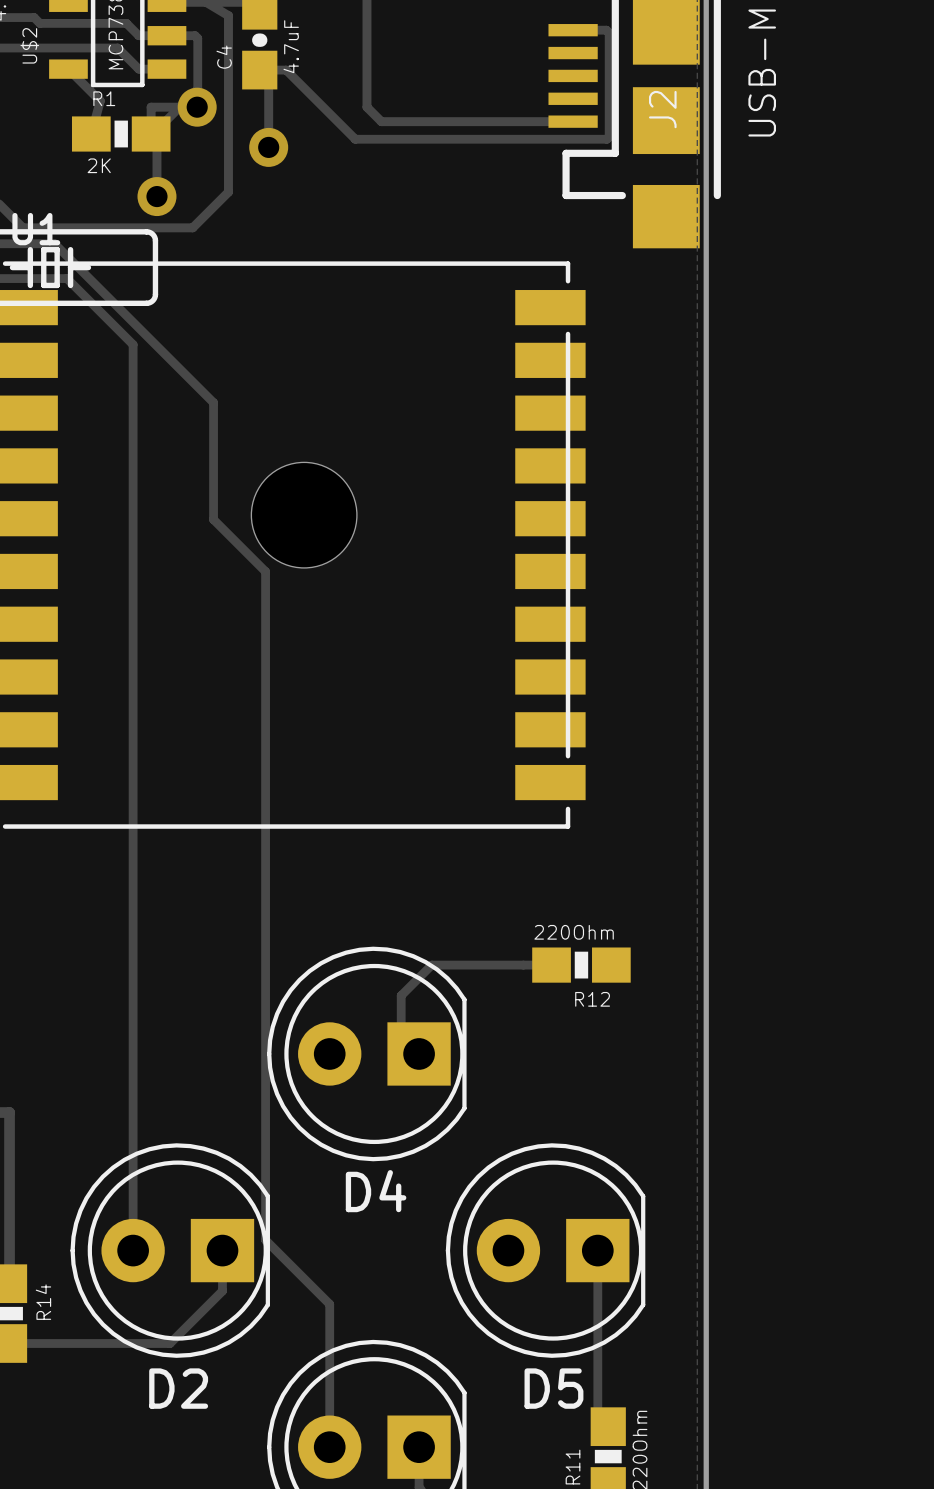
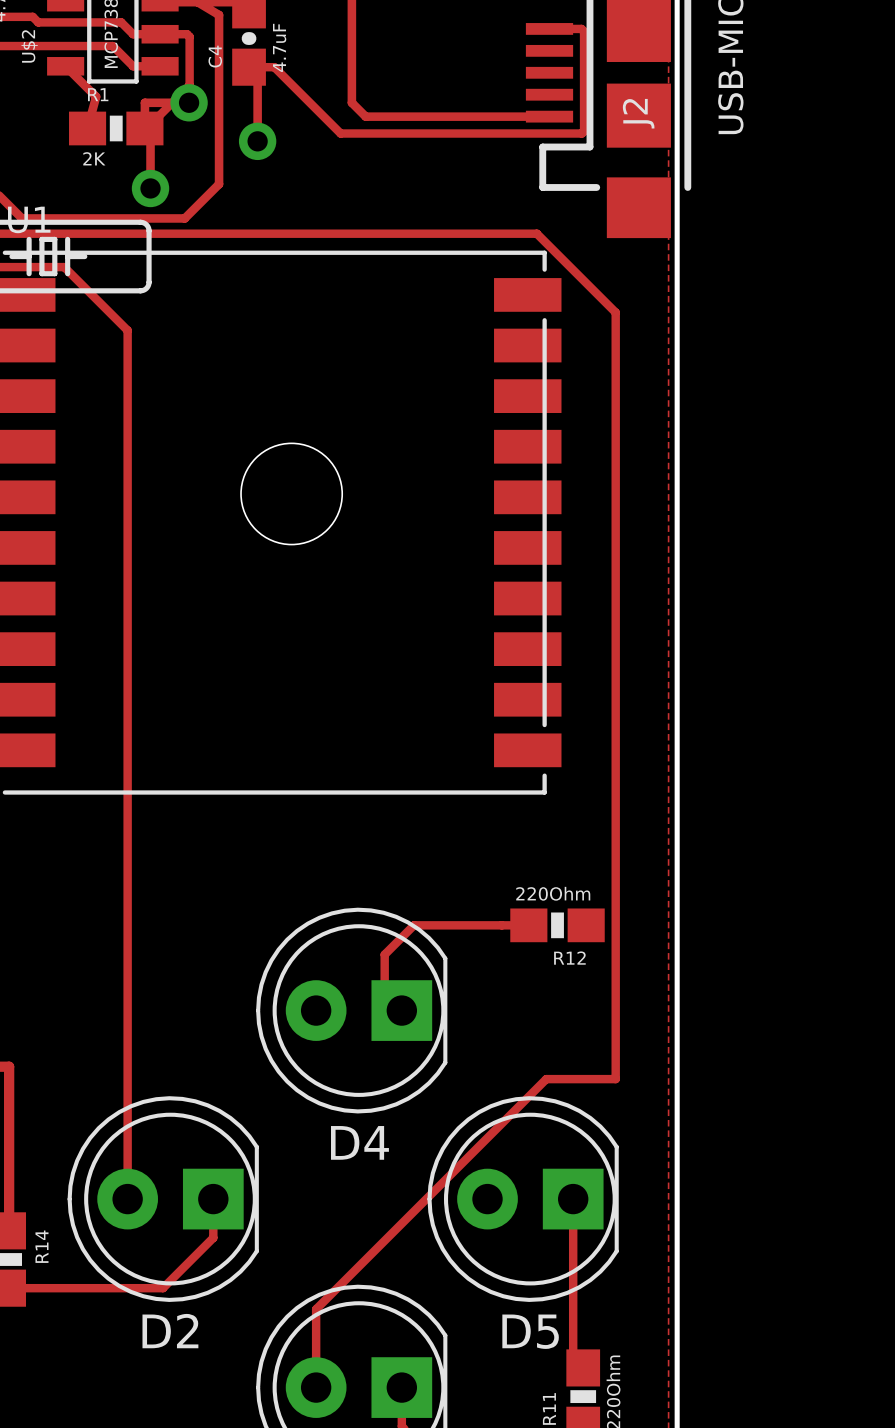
track: (54, 243) (213, 402) (213, 519) (265, 571) (265, 1240) (329, 1304) (329, 1365) -> (52, 233) (536, 233) (615, 312) (615, 1079) (546, 1079) (316, 1309)

